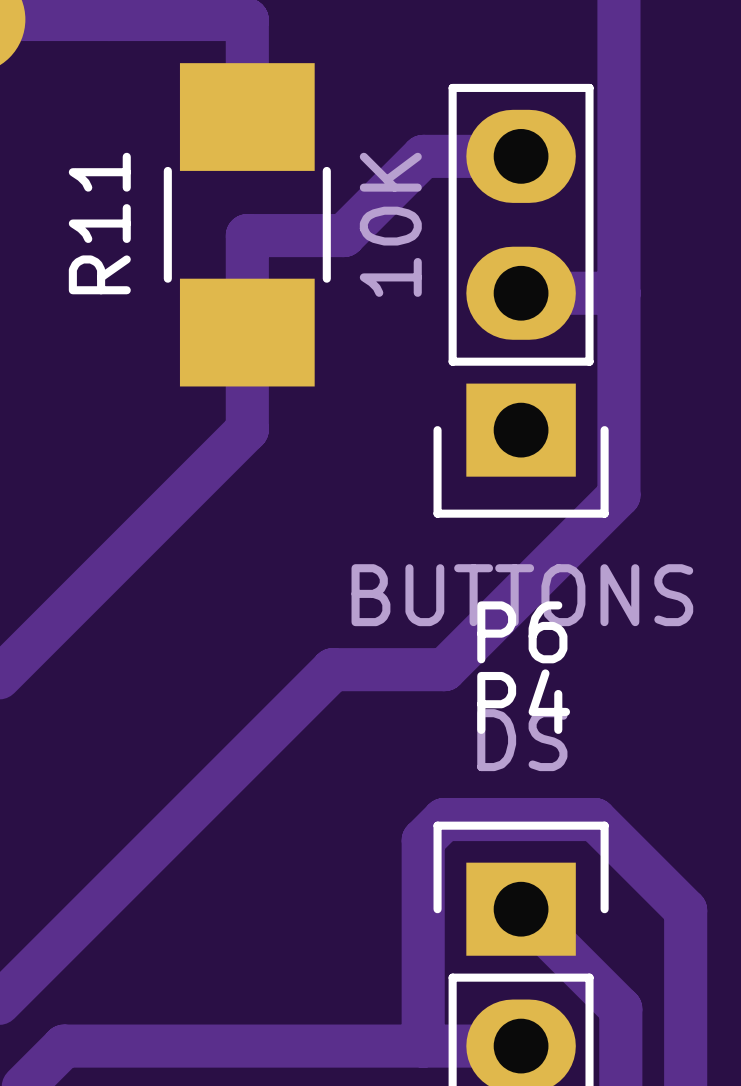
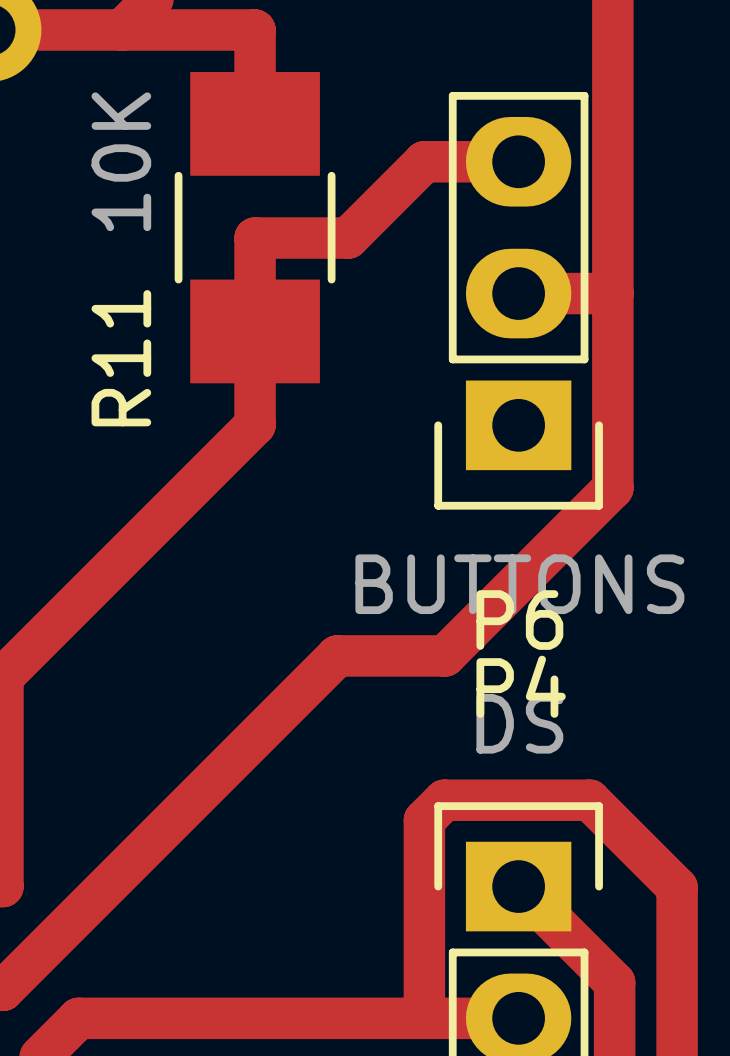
R11 name position: R11 (99, 223) -> R11 (121, 358)
R11 value position: 10K (390, 224) -> 10K (121, 161)

